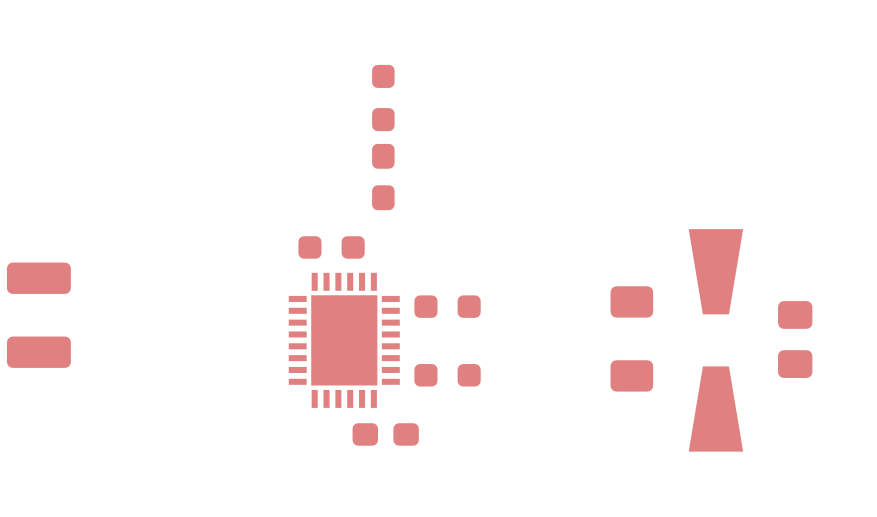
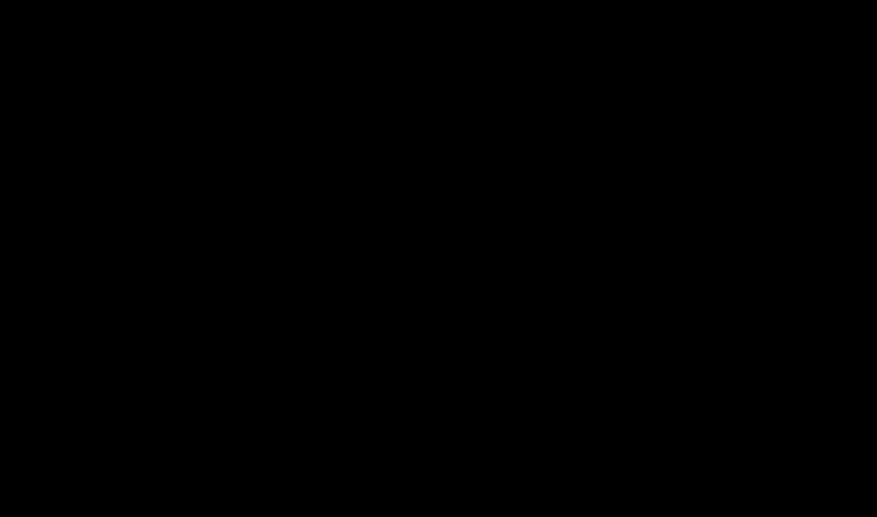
part: (383, 98) -> none
part: (383, 177) -> none
part: (331, 247) -> none
part: (447, 306) -> none
part: (38, 315) -> none
part: (631, 338) -> none
part: (795, 339) -> none
part: (344, 340) -> none
part: (715, 340) -> none
part: (447, 375) -> none
part: (385, 434) -> none

